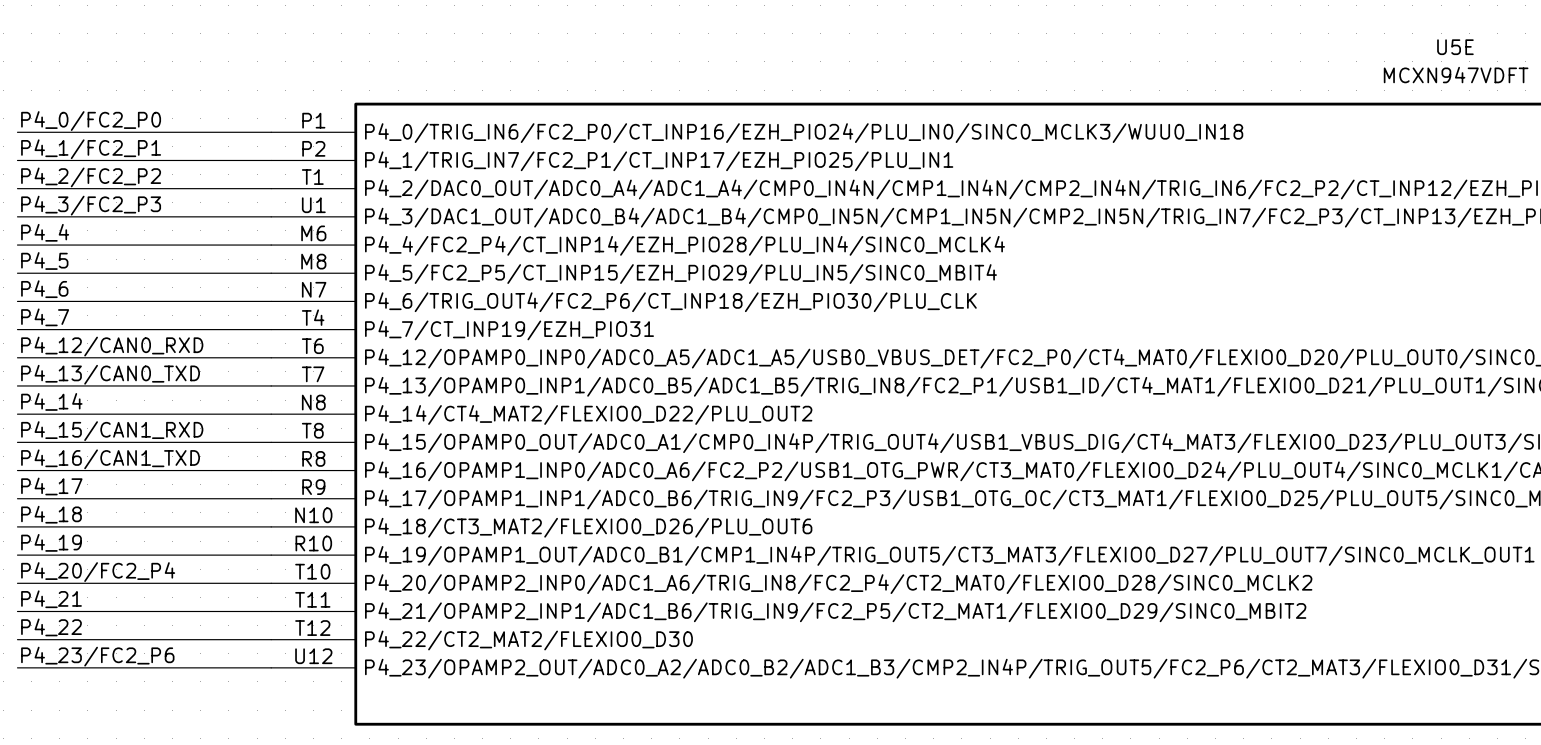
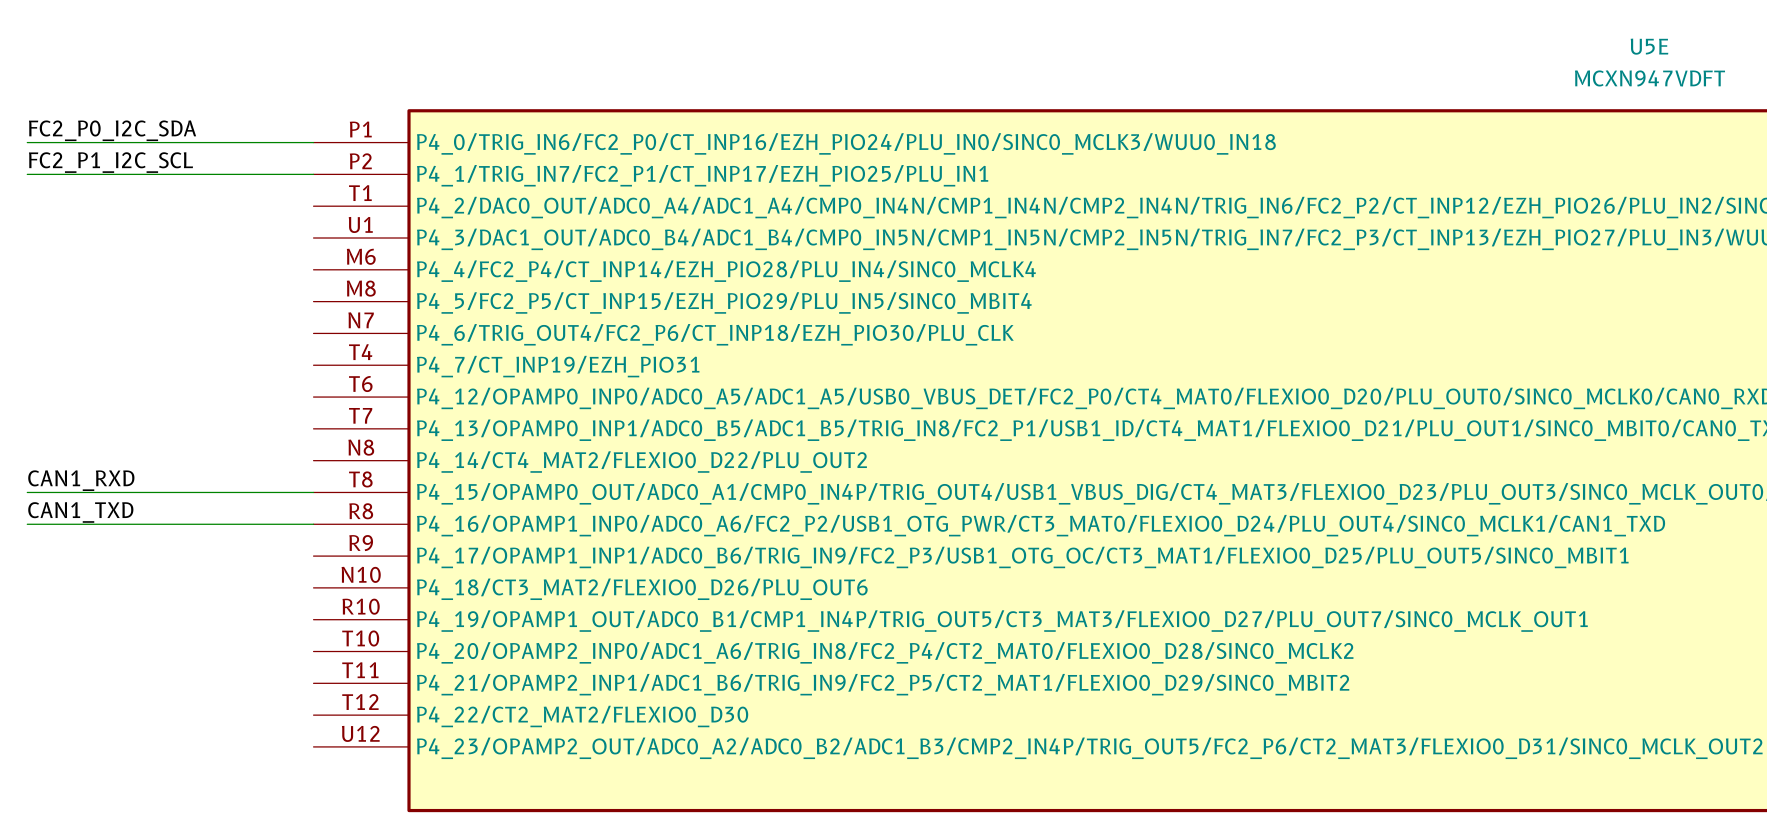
label: P4_0/FC2_P0 (91, 121) -> FC2_P0_I2C_SDA (112, 130)
label: P4_1/FC2_P1 (91, 149) -> FC2_P1_I2C_SCL (111, 162)
label: P4_2/FC2_P2 (91, 177) -> none
wire: (17, 188) (271, 188) -> none
label: P4_3/FC2_P3 (91, 205) -> none
wire: (17, 216) (271, 216) -> none
label: P4_4 (45, 232) -> none
wire: (17, 245) (271, 245) -> none
label: P4_5 (44, 260) -> none
wire: (17, 273) (271, 273) -> none
label: P4_6 (44, 289) -> none
wire: (17, 301) (271, 301) -> none
label: P4_7 (45, 317) -> none
wire: (17, 329) (271, 329) -> none
label: P4_12/CAN0_RXD (112, 346) -> none
wire: (17, 357) (271, 357) -> none
label: P4_13/CAN0_TXD (110, 374) -> none
wire: (17, 385) (271, 385) -> none
label: P4_14 (51, 401) -> none
wire: (17, 414) (271, 414) -> none
label: P4_15/CAN1_RXD (112, 431) -> CAN1_RXD (81, 480)
label: P4_16/CAN1_TXD (110, 459) -> CAN1_TXD (80, 512)
label: P4_17 (51, 486) -> none
wire: (17, 498) (271, 498) -> none
label: P4_18 (51, 514) -> none
wire: (17, 526) (271, 526) -> none
label: P4_19 (51, 542) -> none
wire: (17, 555) (271, 555) -> none
label: P4_20/FC2_P4 (98, 572) -> none
wire: (17, 583) (271, 583) -> none
label: P4_21 (51, 599) -> none
wire: (17, 611) (271, 611) -> none
label: P4_22 (51, 627) -> none
wire: (17, 639) (271, 639) -> none
label: P4_23/FC2_P6 (97, 656) -> none
wire: (17, 667) (271, 667) -> none

